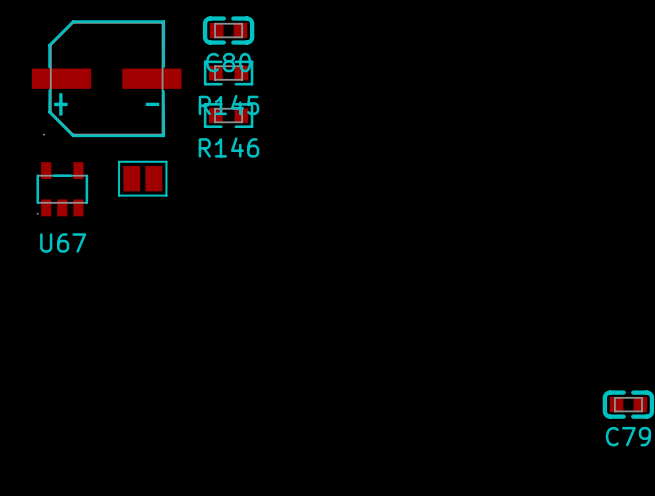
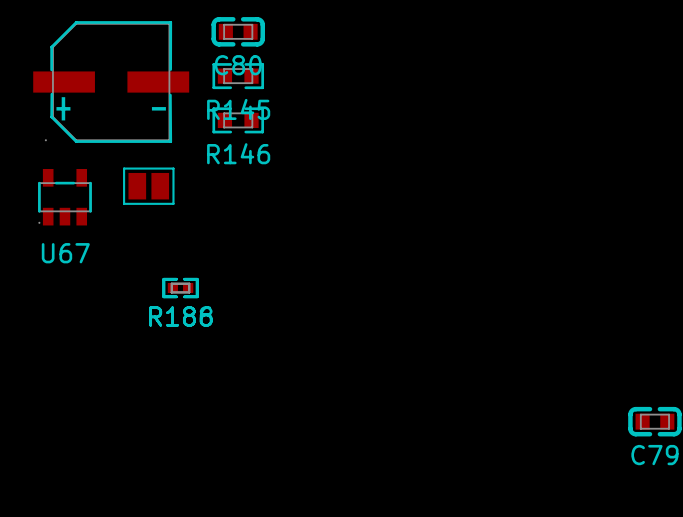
part: none -> (180, 288)
part: none -> (180, 288)

